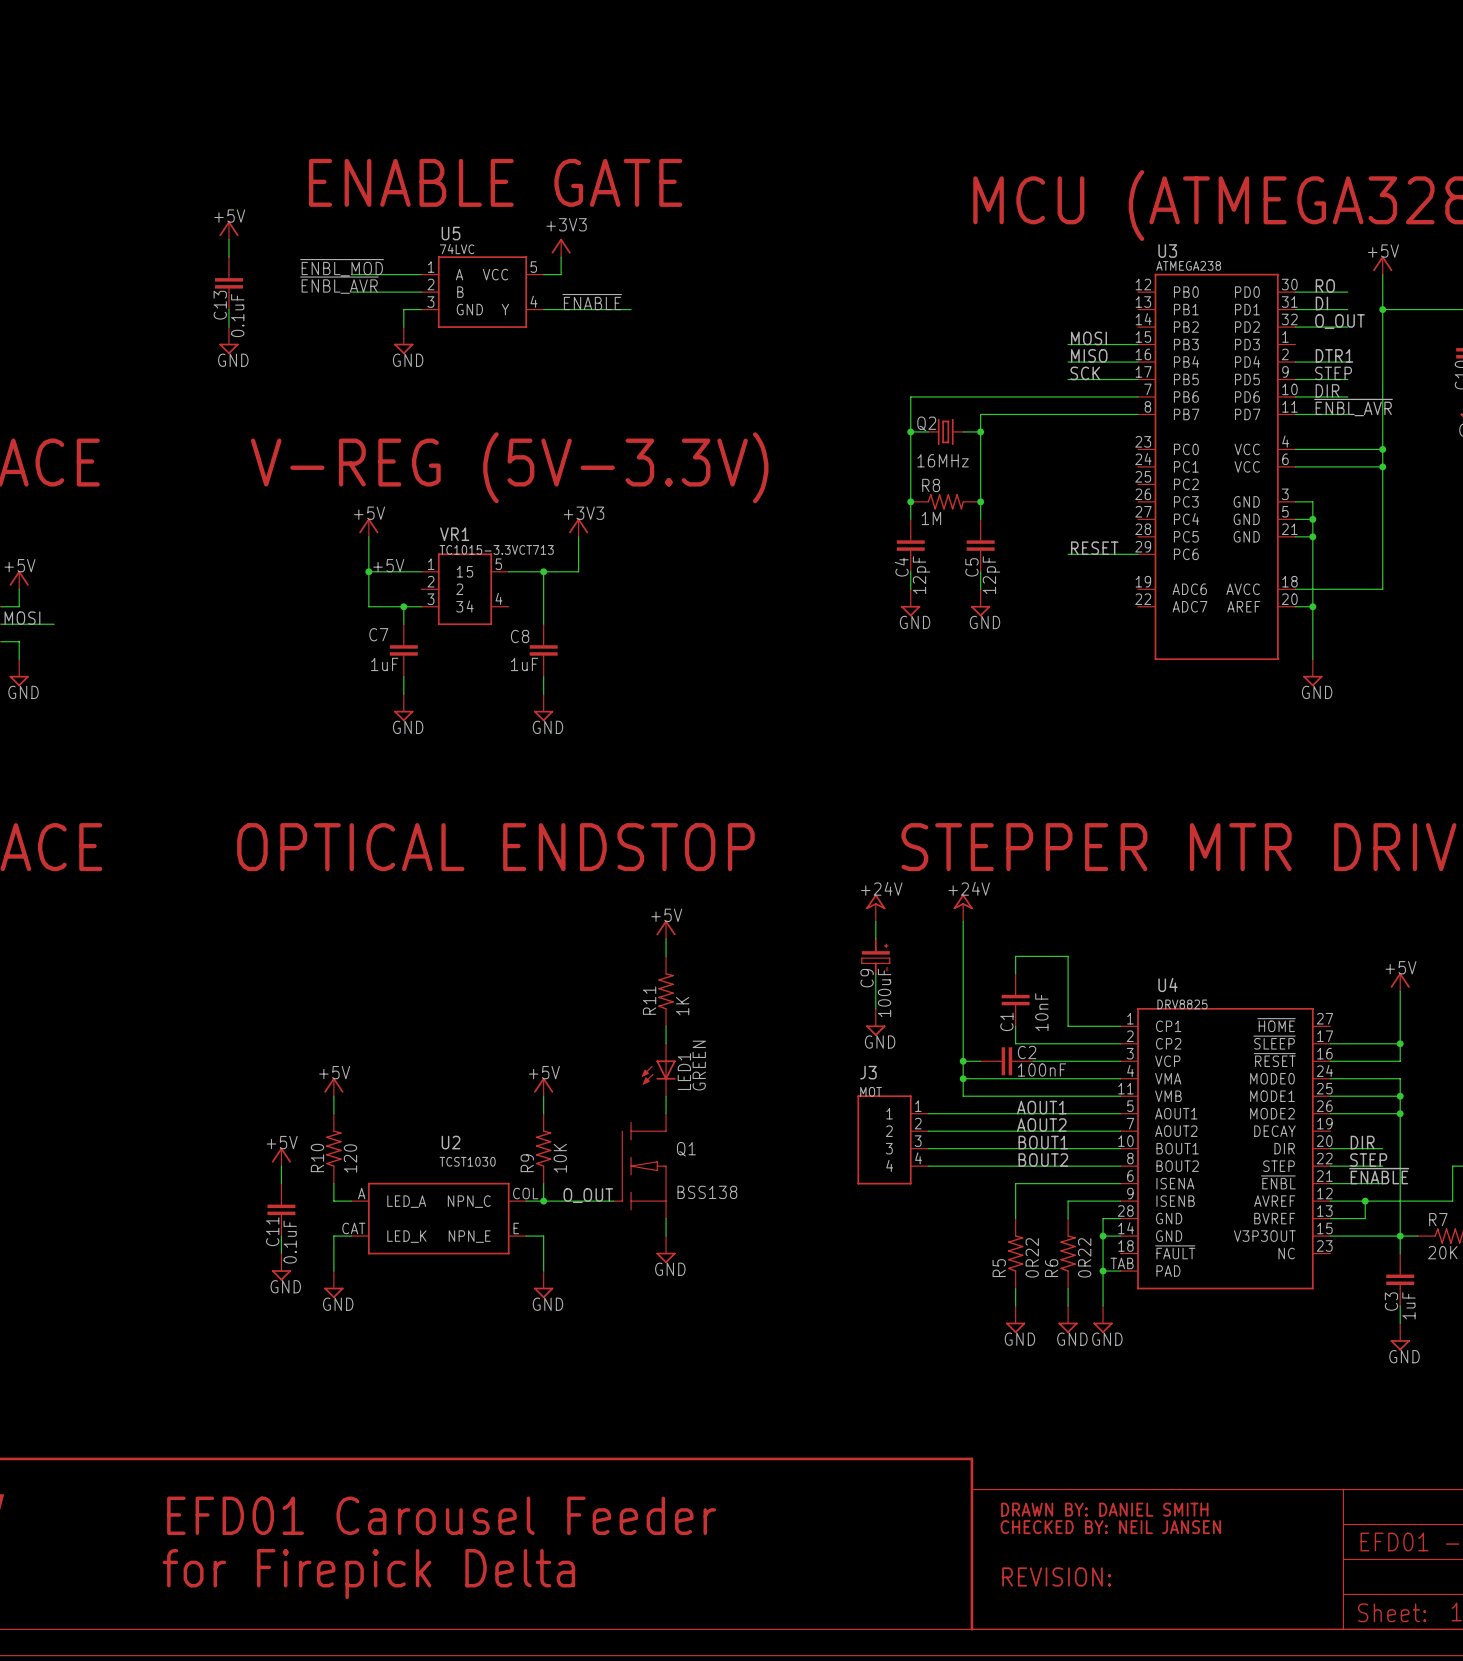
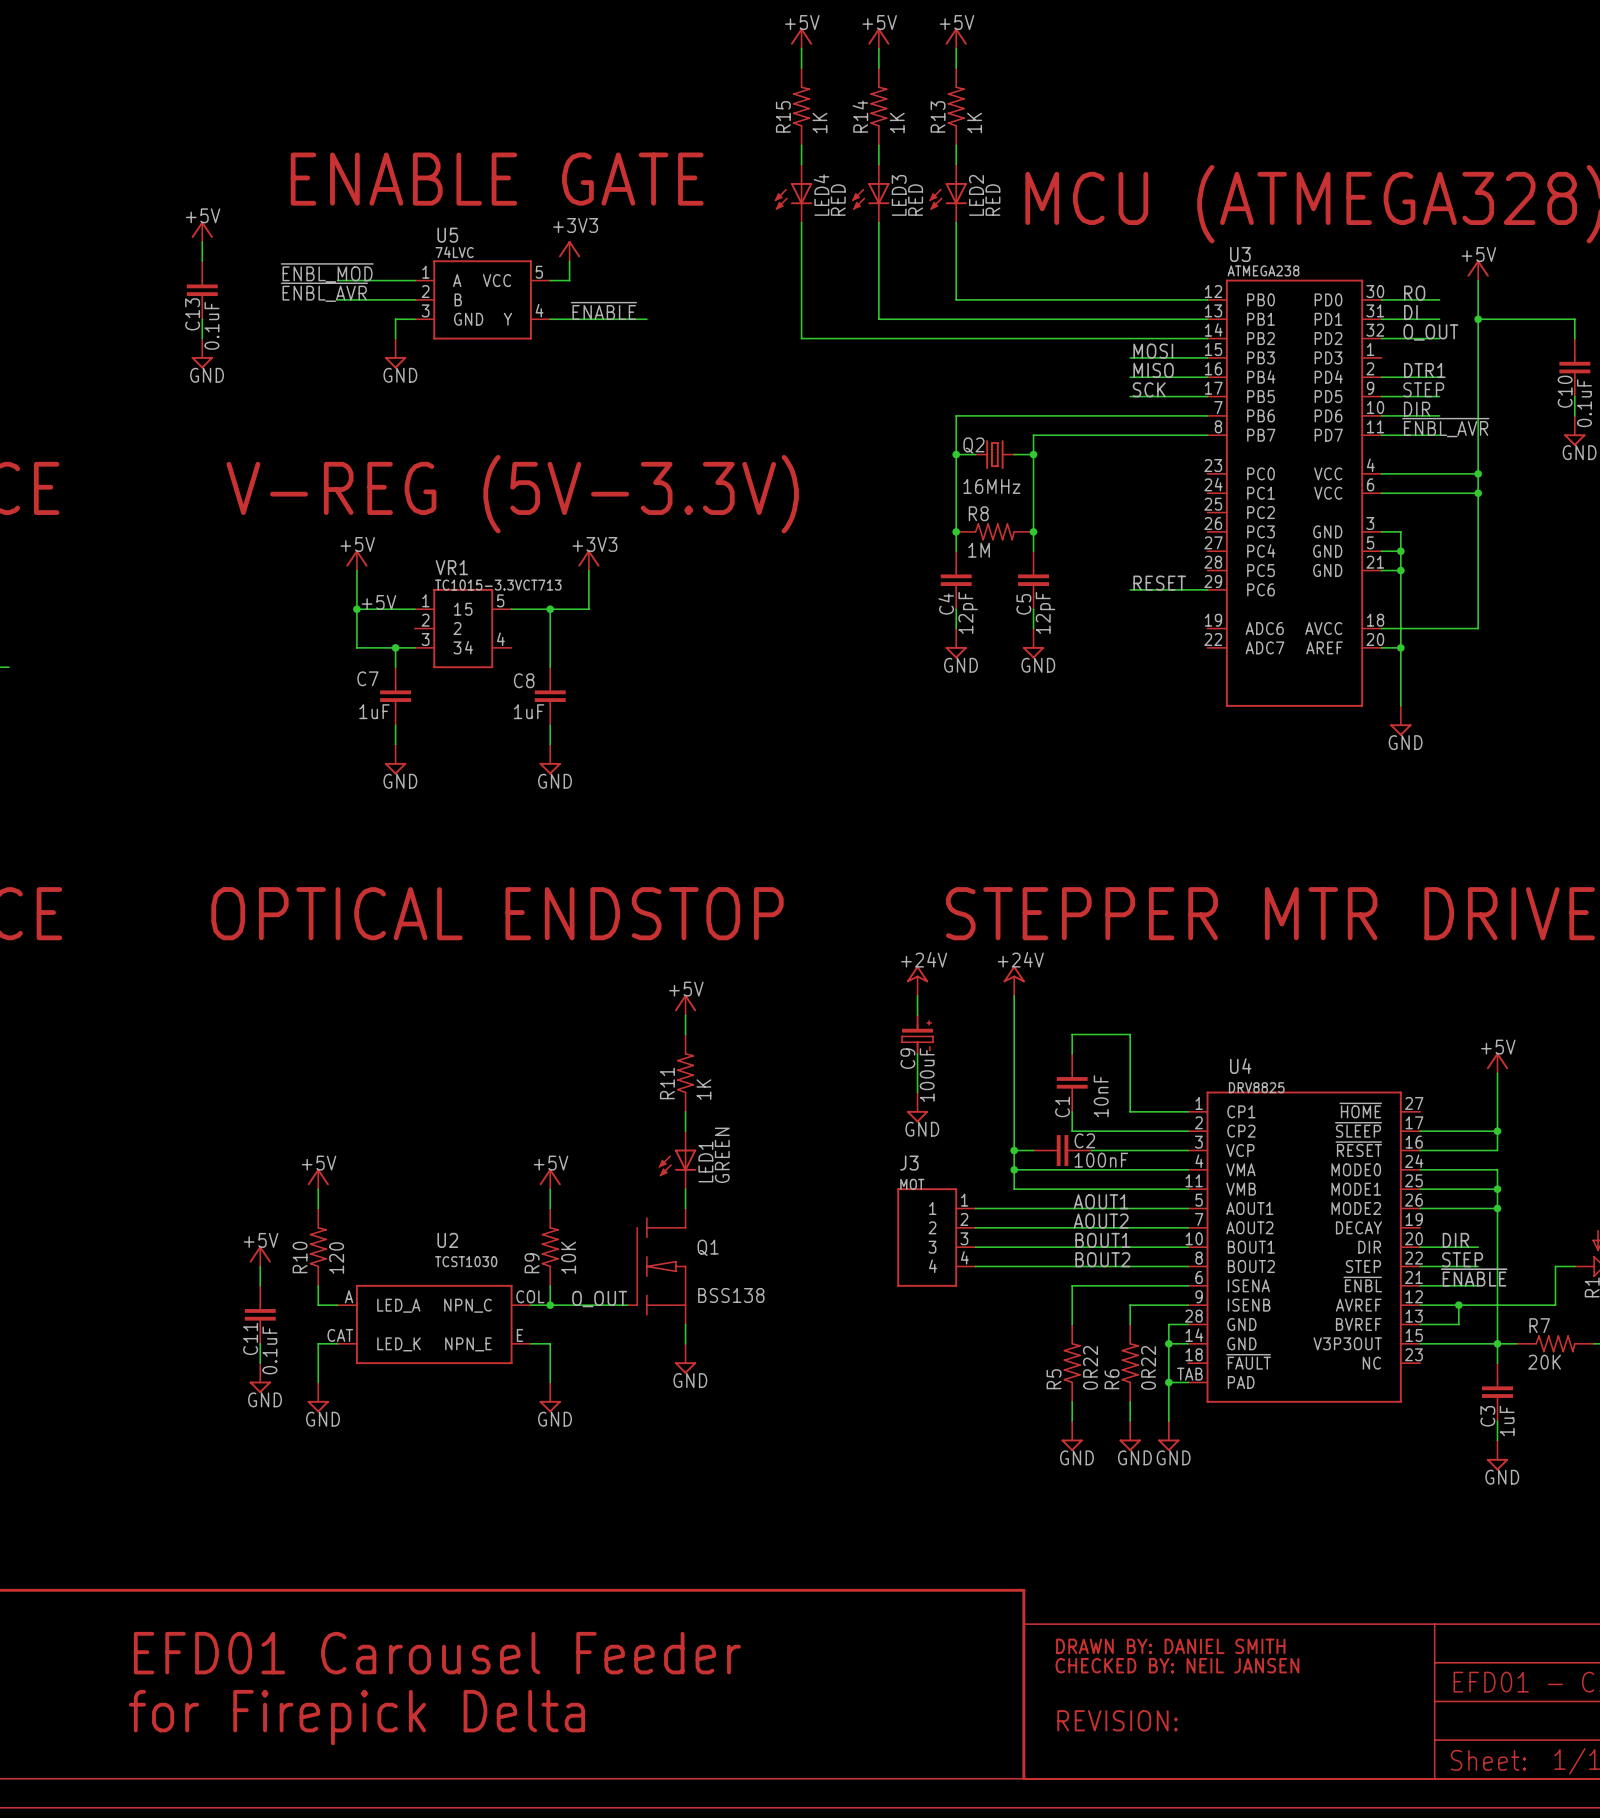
power symbol: none -> +5V (801, 38)
power symbol: none -> +5V (878, 38)
power symbol: none -> +5V (956, 38)
wire: none -> (801, 48) (801, 67)
wire: none -> (878, 48) (878, 67)
wire: none -> (956, 48) (956, 67)
R15: none -> 1K (801, 106)
R14: none -> 1K (878, 106)
R13: none -> 1K (956, 106)
wire: none -> (801, 145) (801, 164)
wire: none -> (878, 145) (878, 164)
wire: none -> (956, 145) (956, 164)
LED4: none -> RED (793, 193)
LED3: none -> RED (870, 193)
LED2: none -> RED (948, 193)
wire: none -> (801, 222) (801, 338) (1207, 338)
wire: none -> (878, 222) (878, 319) (1207, 319)
wire: none -> (956, 222) (956, 299) (1207, 299)

